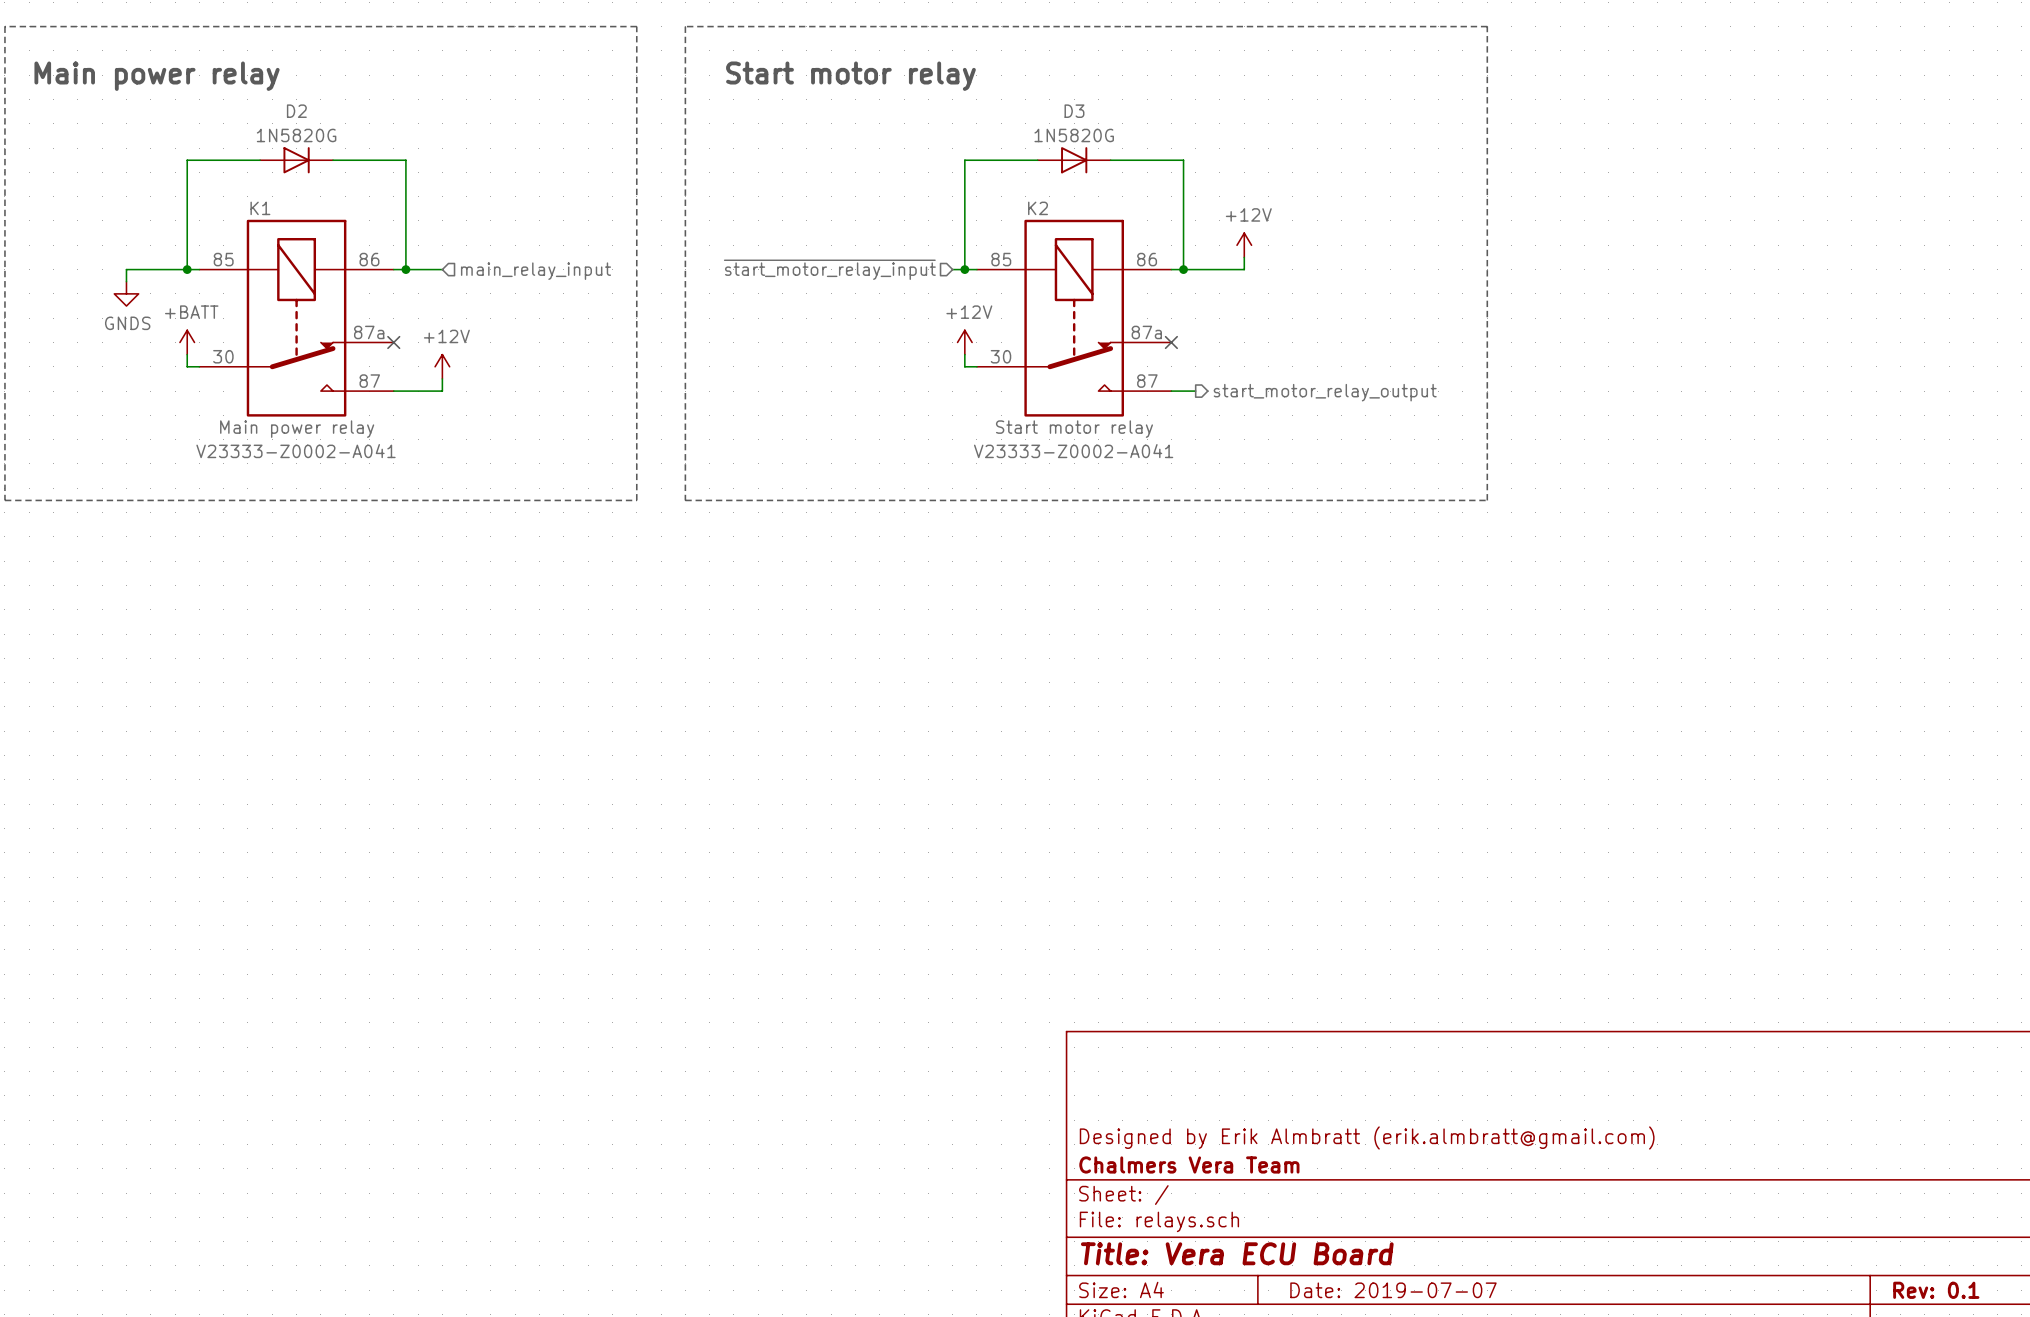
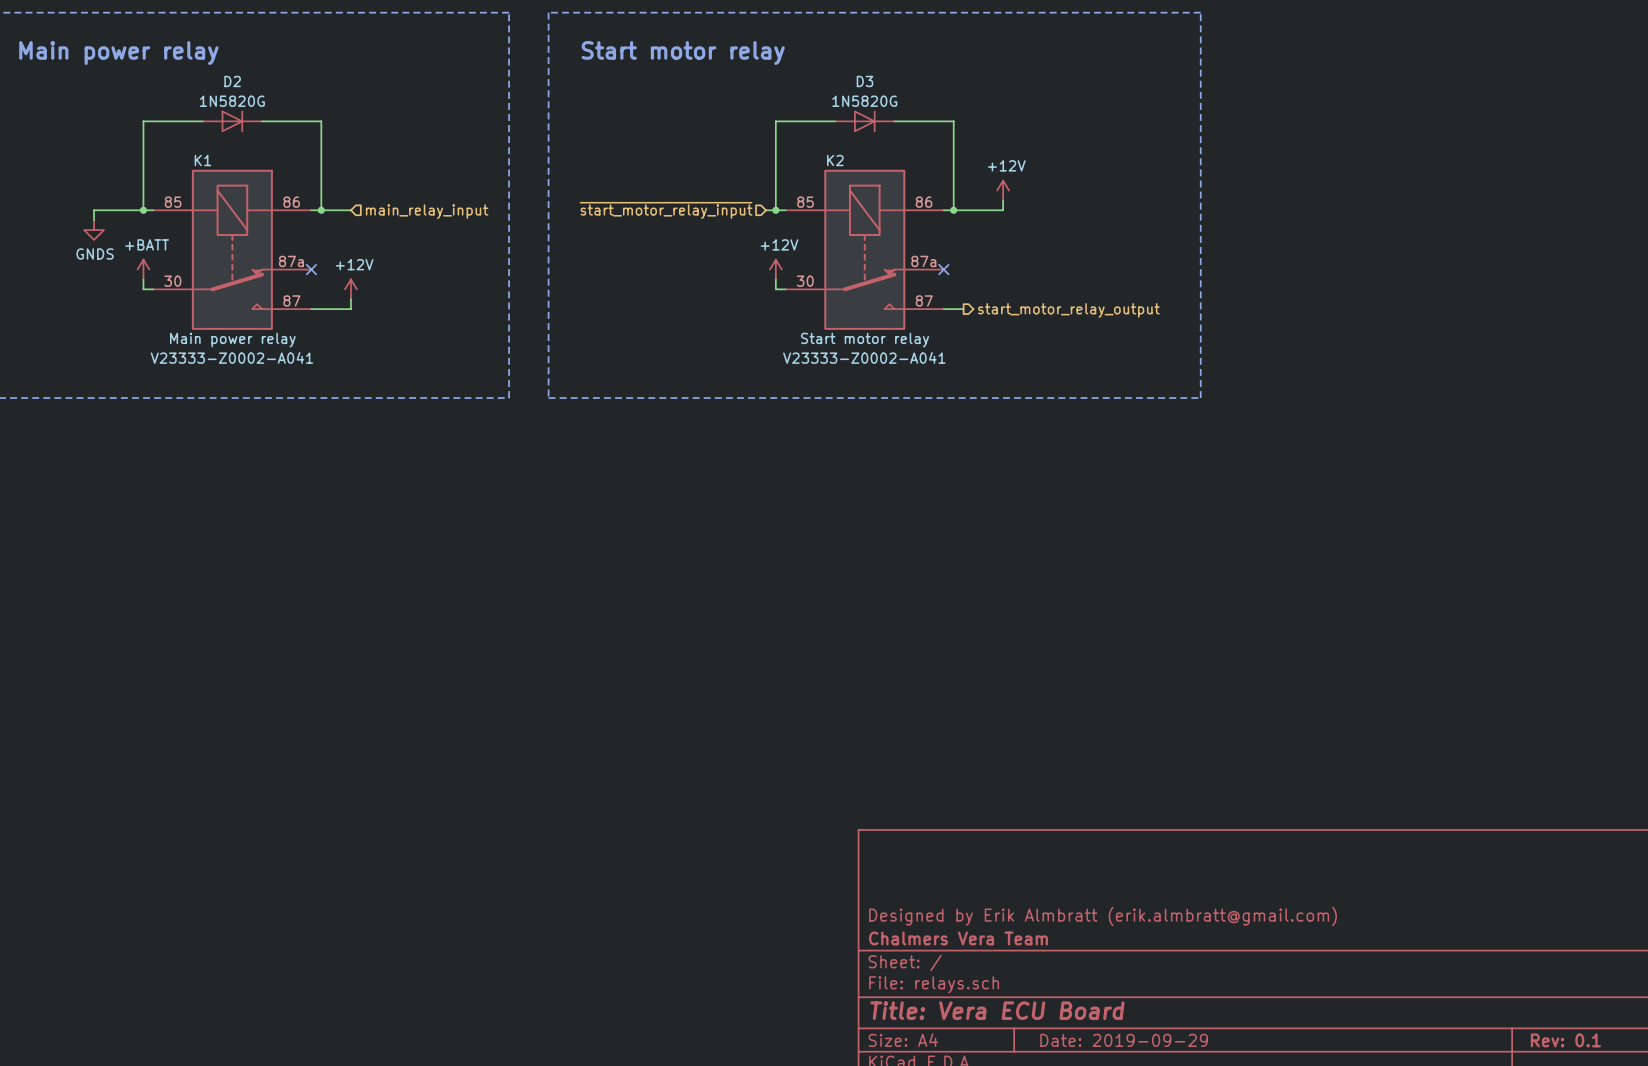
title block: Date: 2019-07-07 (1393, 1290) -> Date: 2019-09-29 (1124, 1040)

